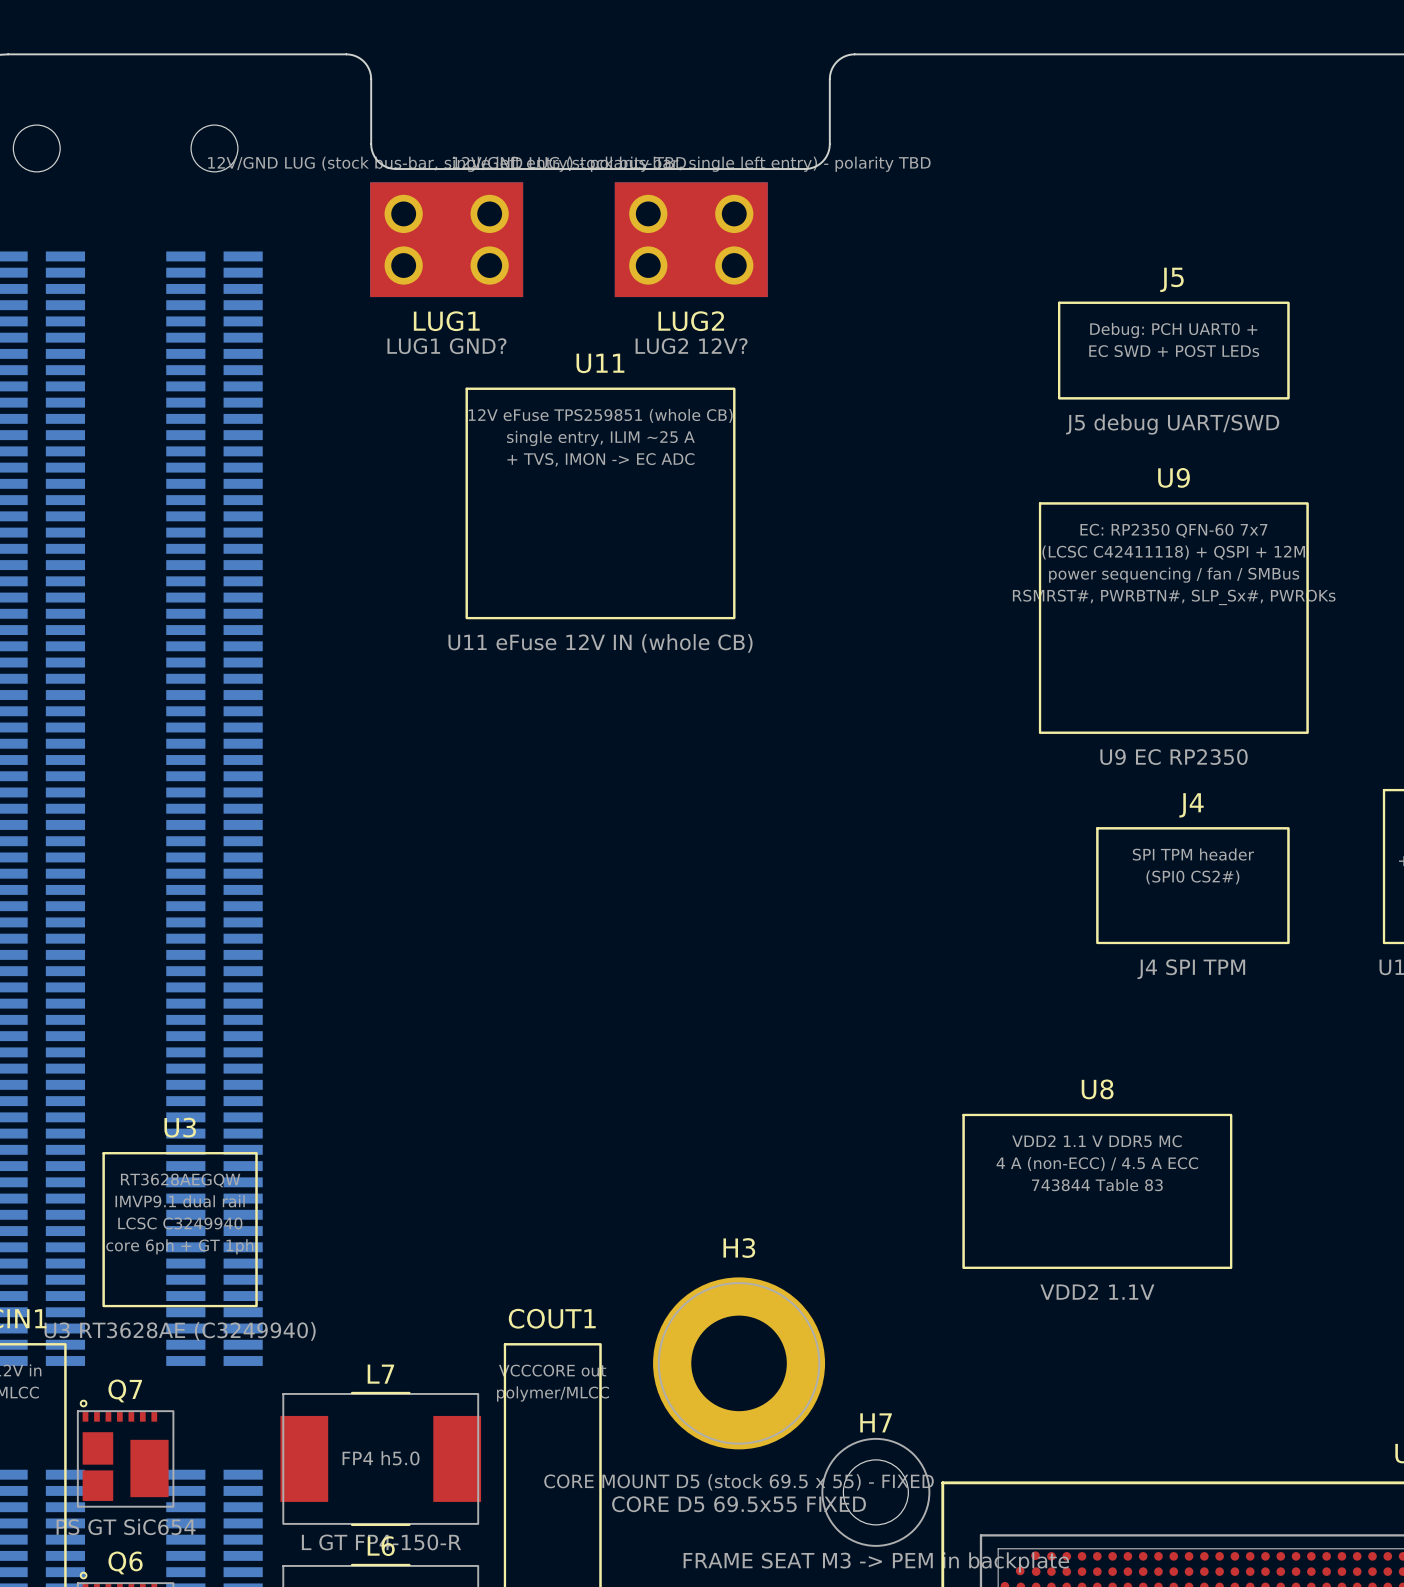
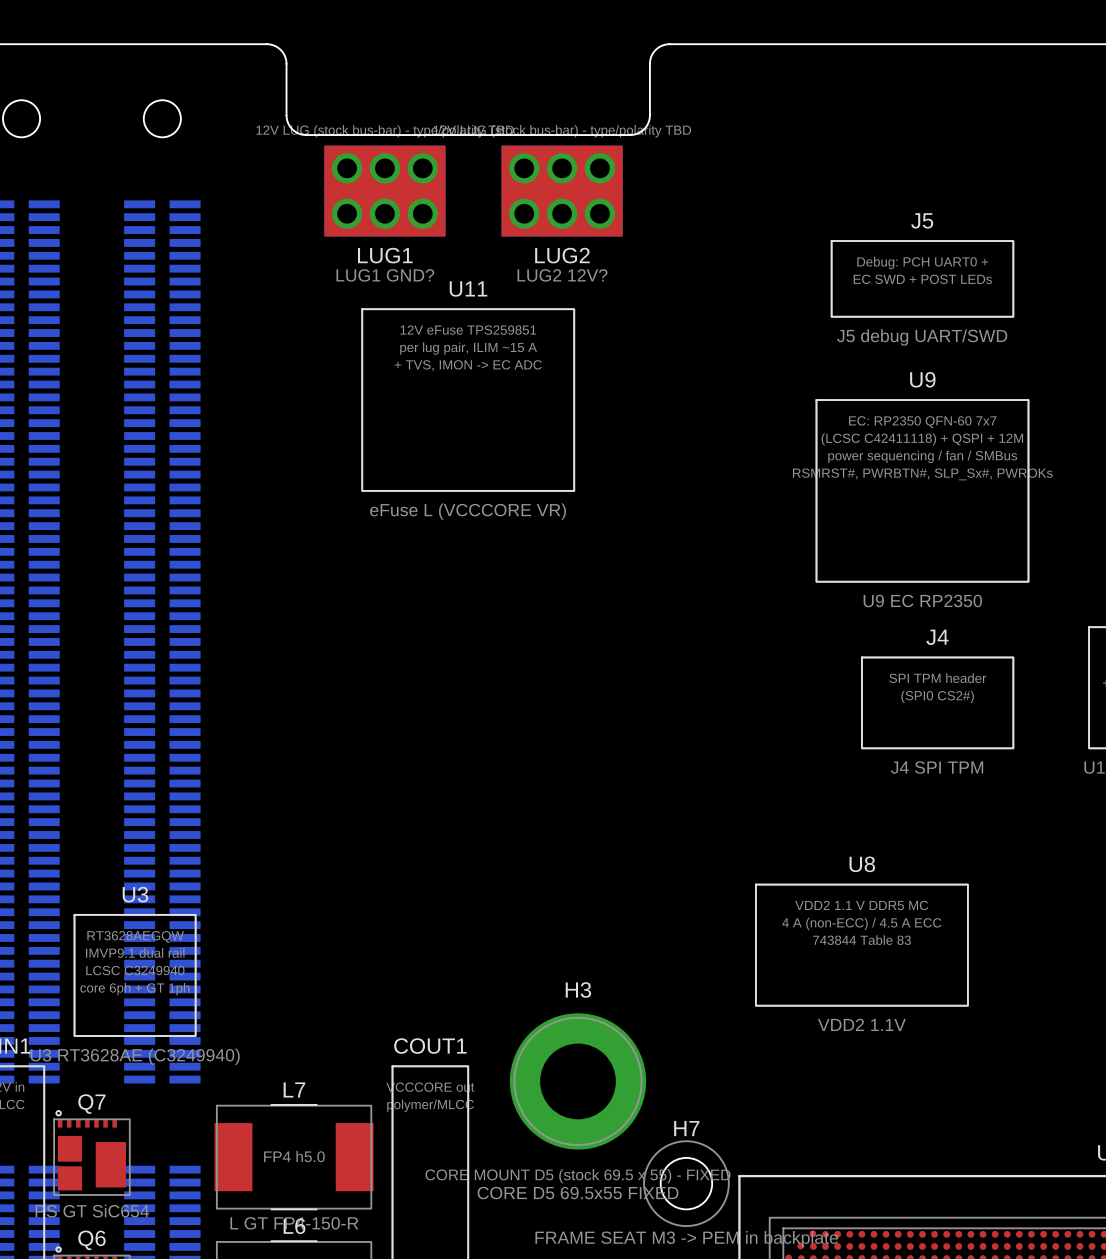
LUG1 footprint: [370, 182, 524, 298] -> [324, 145, 446, 237]
LUG2 footprint: [614, 182, 768, 298] -> [501, 145, 623, 237]
U11 text: 12V eFuse TPS259851 (whole CB) (600, 415) -> 12V eFuse TPS259851 (468, 330)
U11 text: single entry, ILIM ~25 A (600, 438) -> per lug pair, ILIM ~15 A (468, 348)
U11 value: U11 eFuse 12V IN (whole CB) (600, 643) -> eFuse L (VCCCORE VR) (468, 511)

